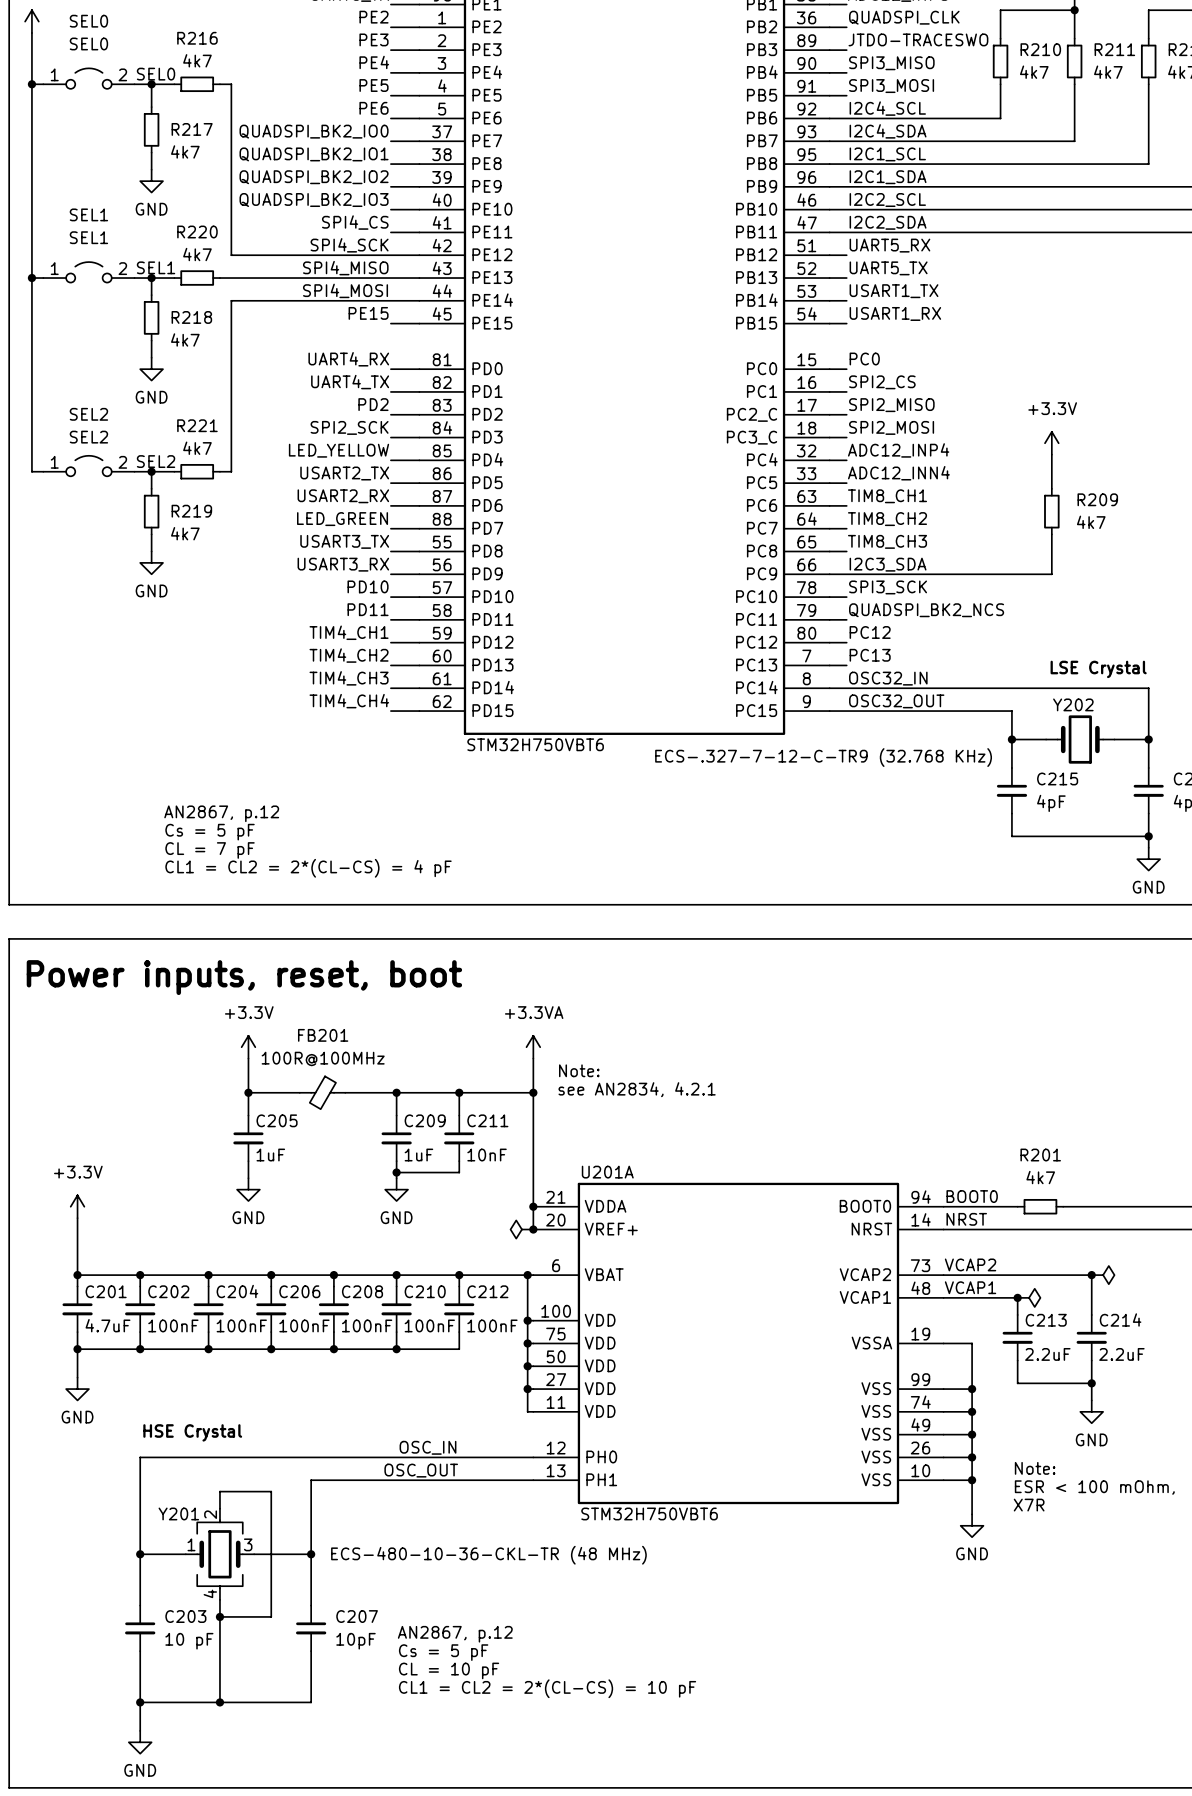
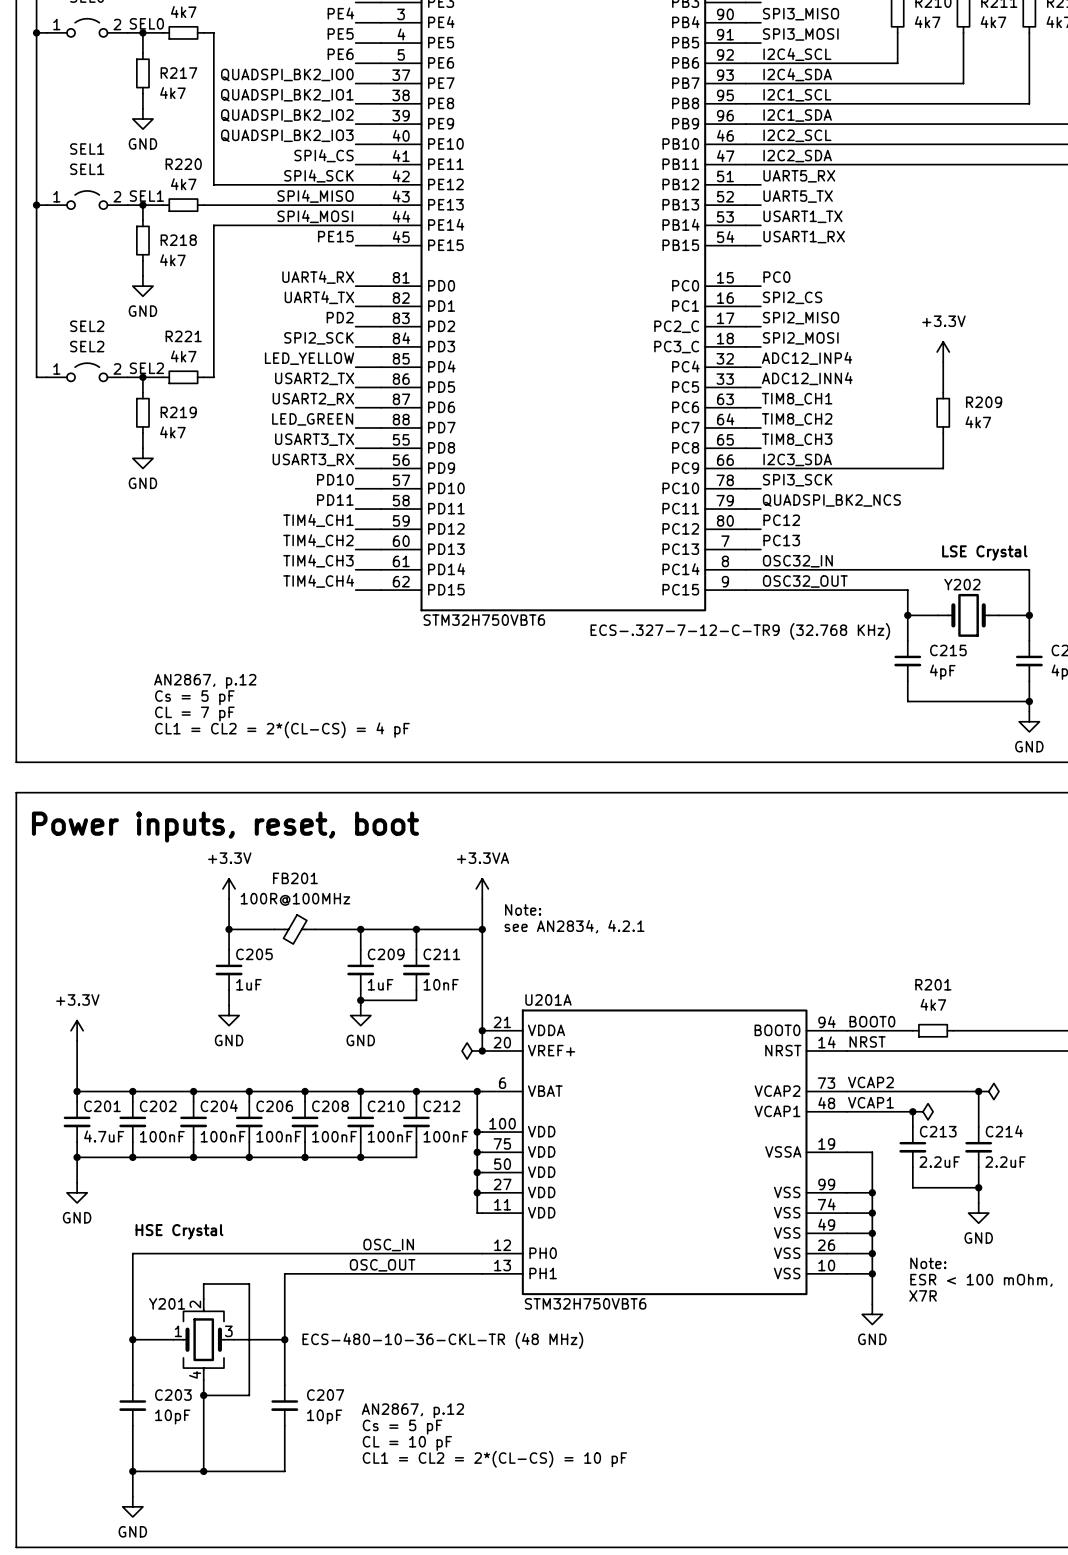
C203 value: 10 pF (189, 1641) -> 10pF (172, 1417)

